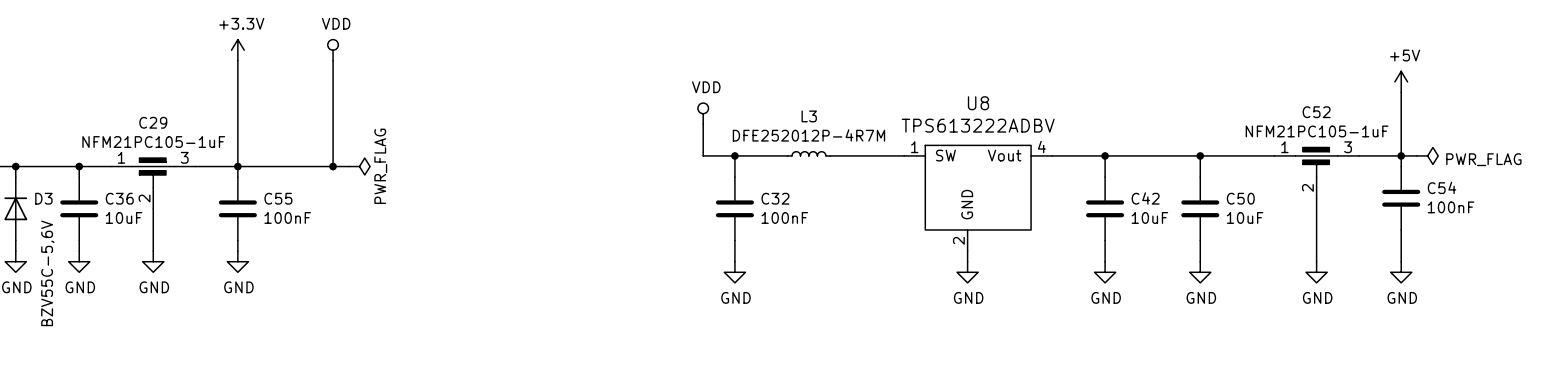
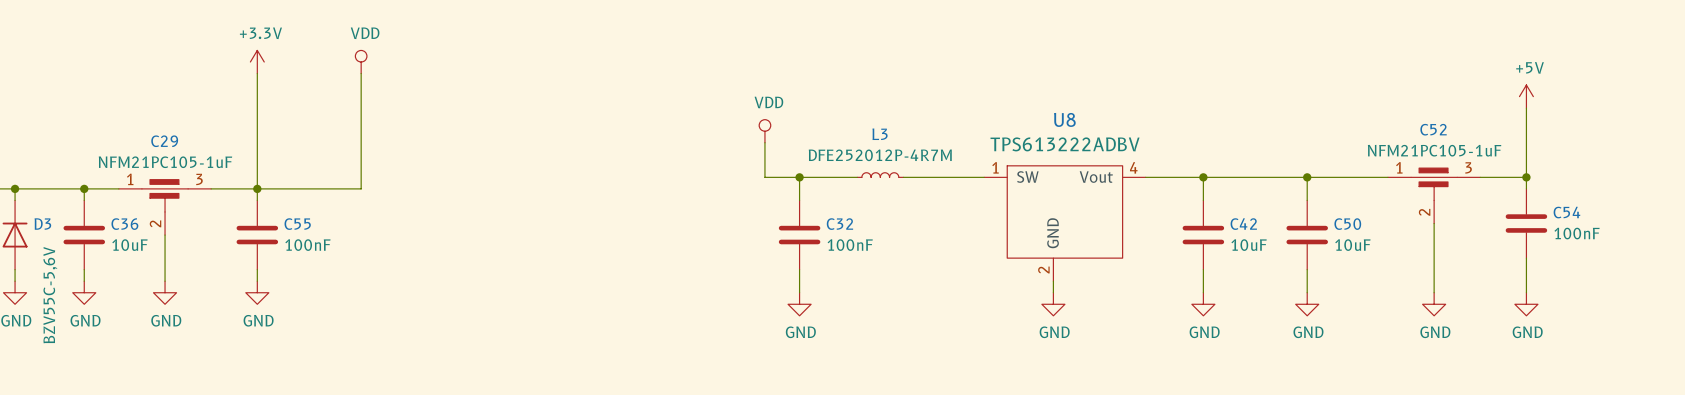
wire: (1401, 155) (1417, 155) -> none
power symbol: PWR_FLAG (1427, 155) -> none
wire: (333, 166) (348, 166) -> none
junction: (333, 166) -> none
power symbol: PWR_FLAG (359, 166) -> none

